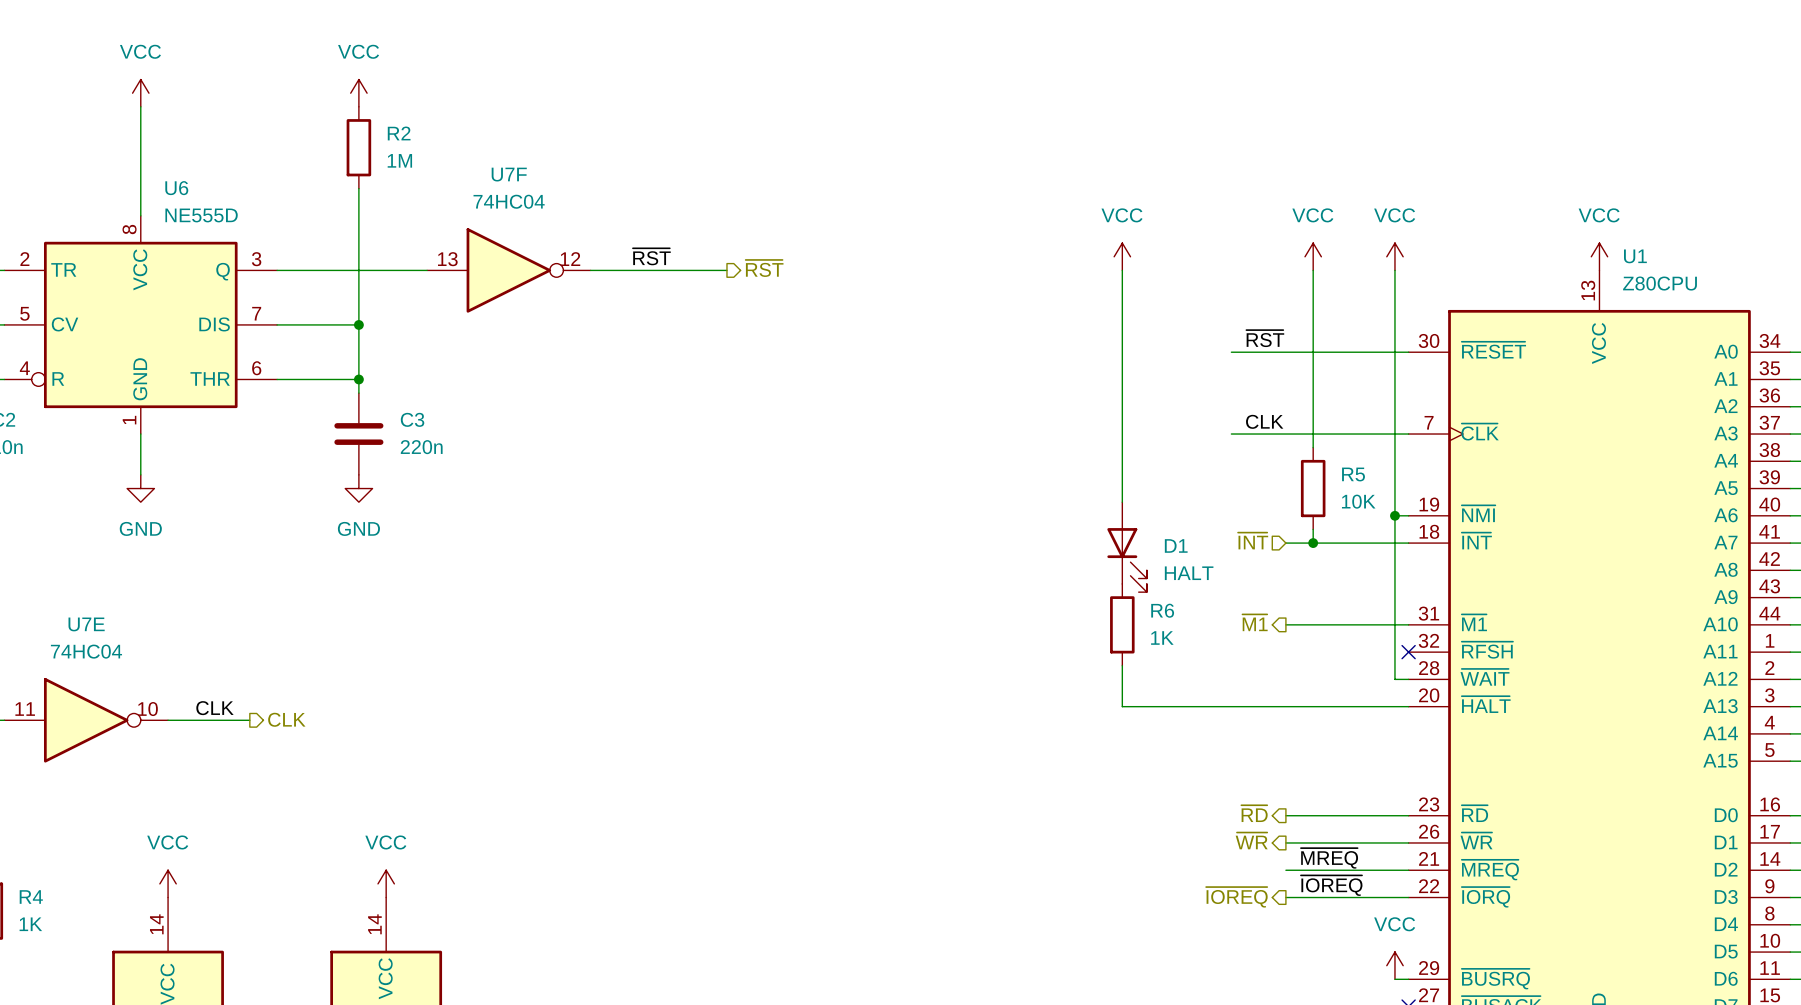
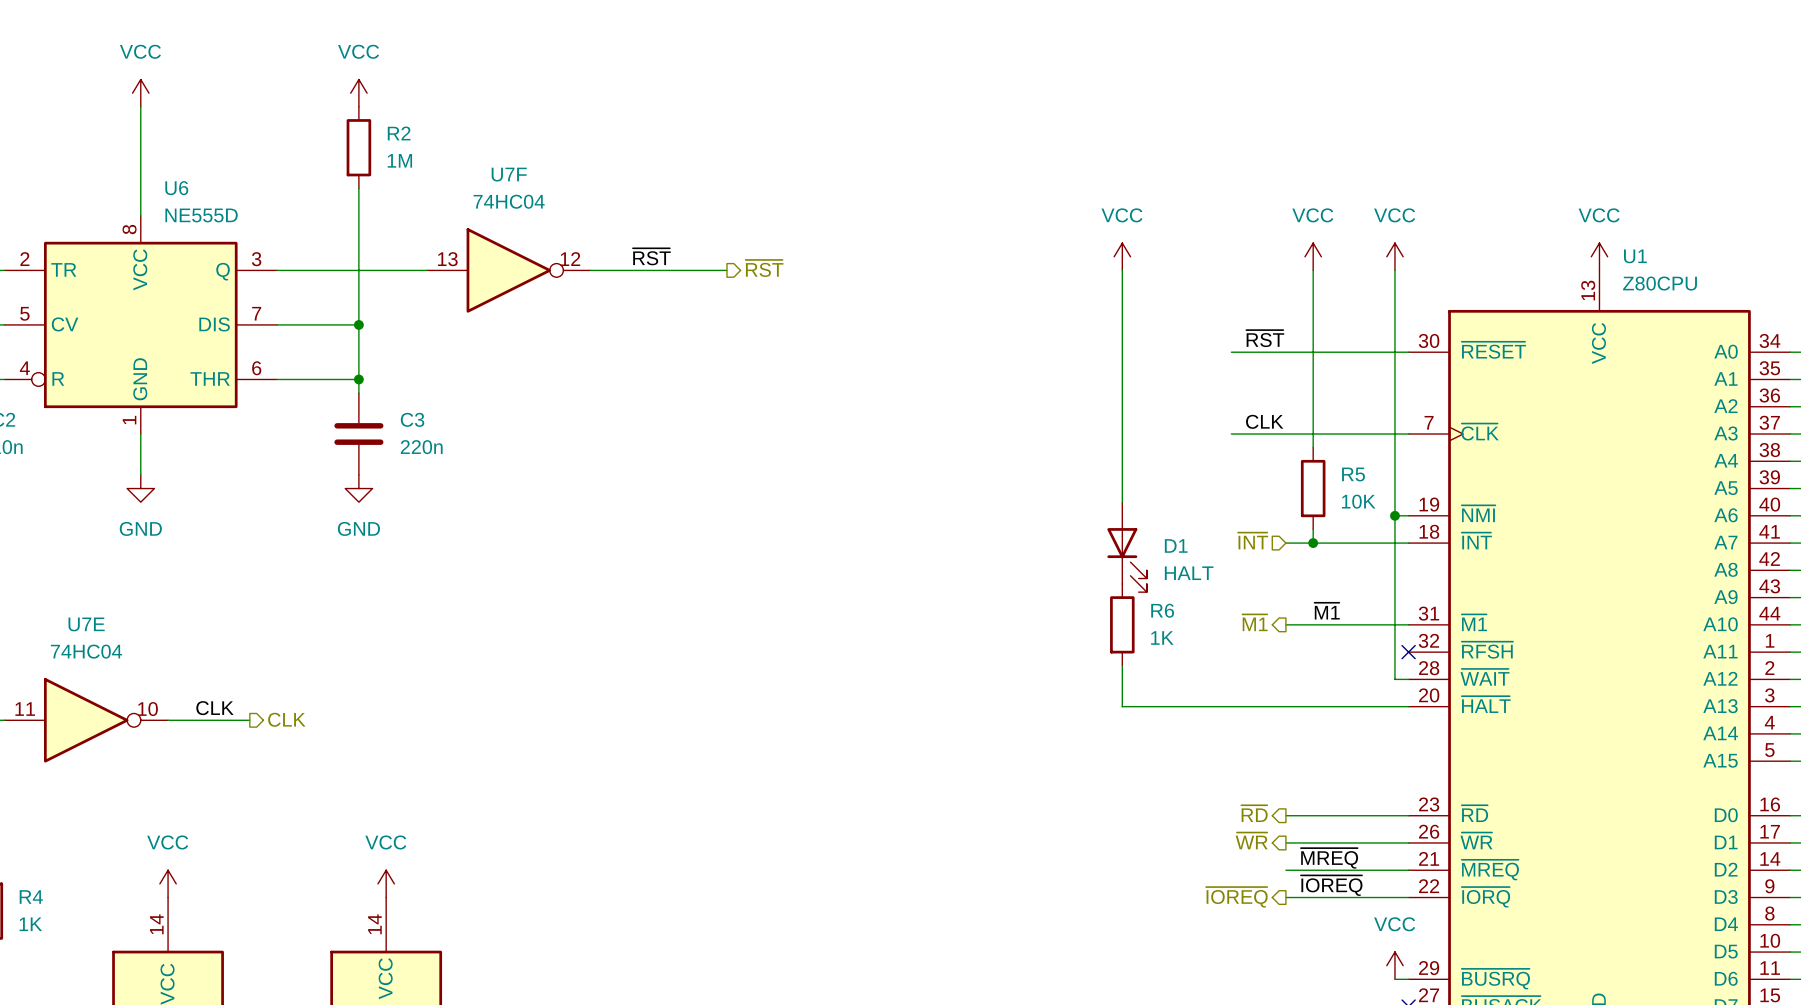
label: none -> ~{M1} (1327, 611)

